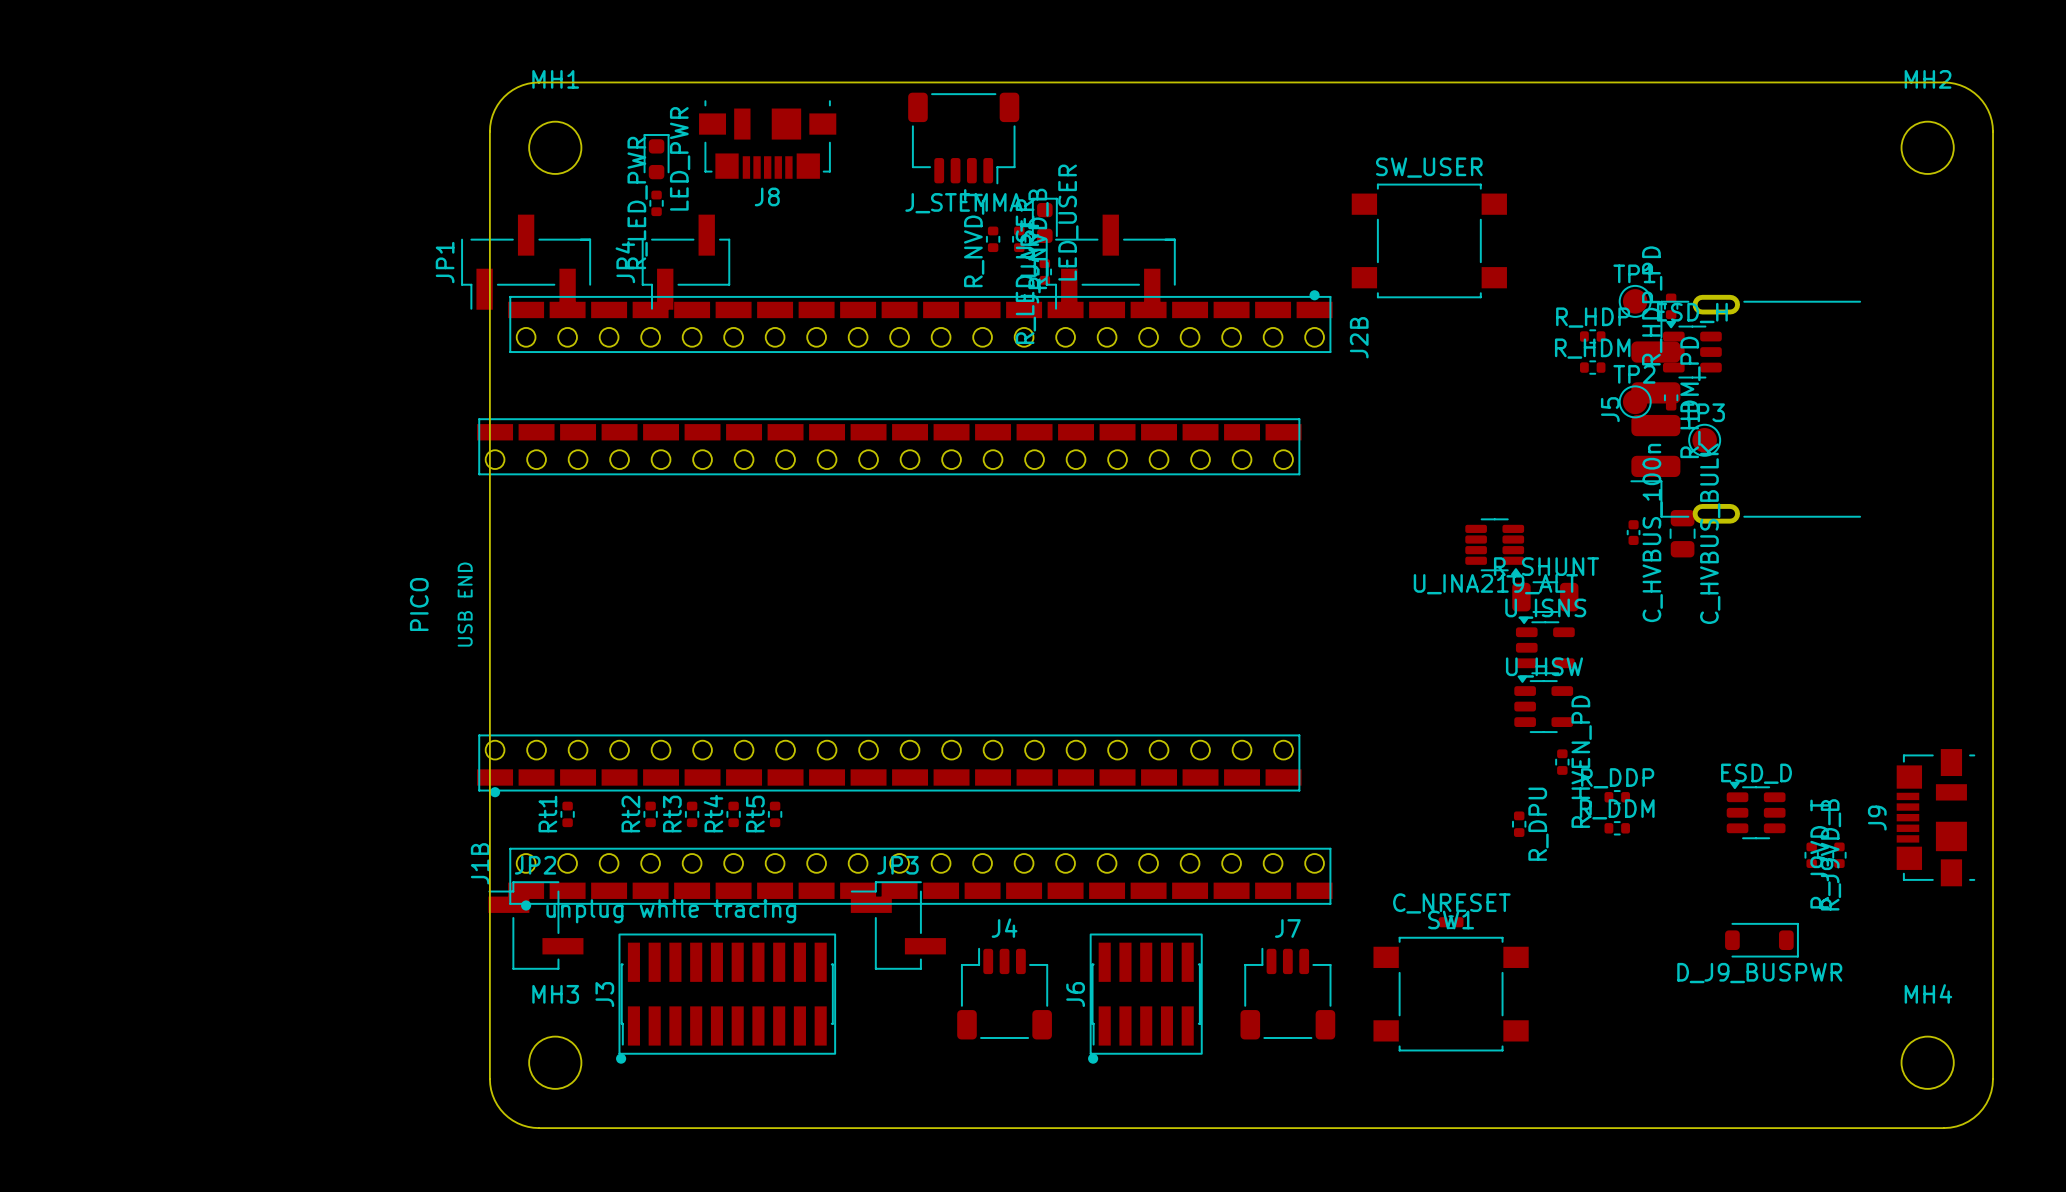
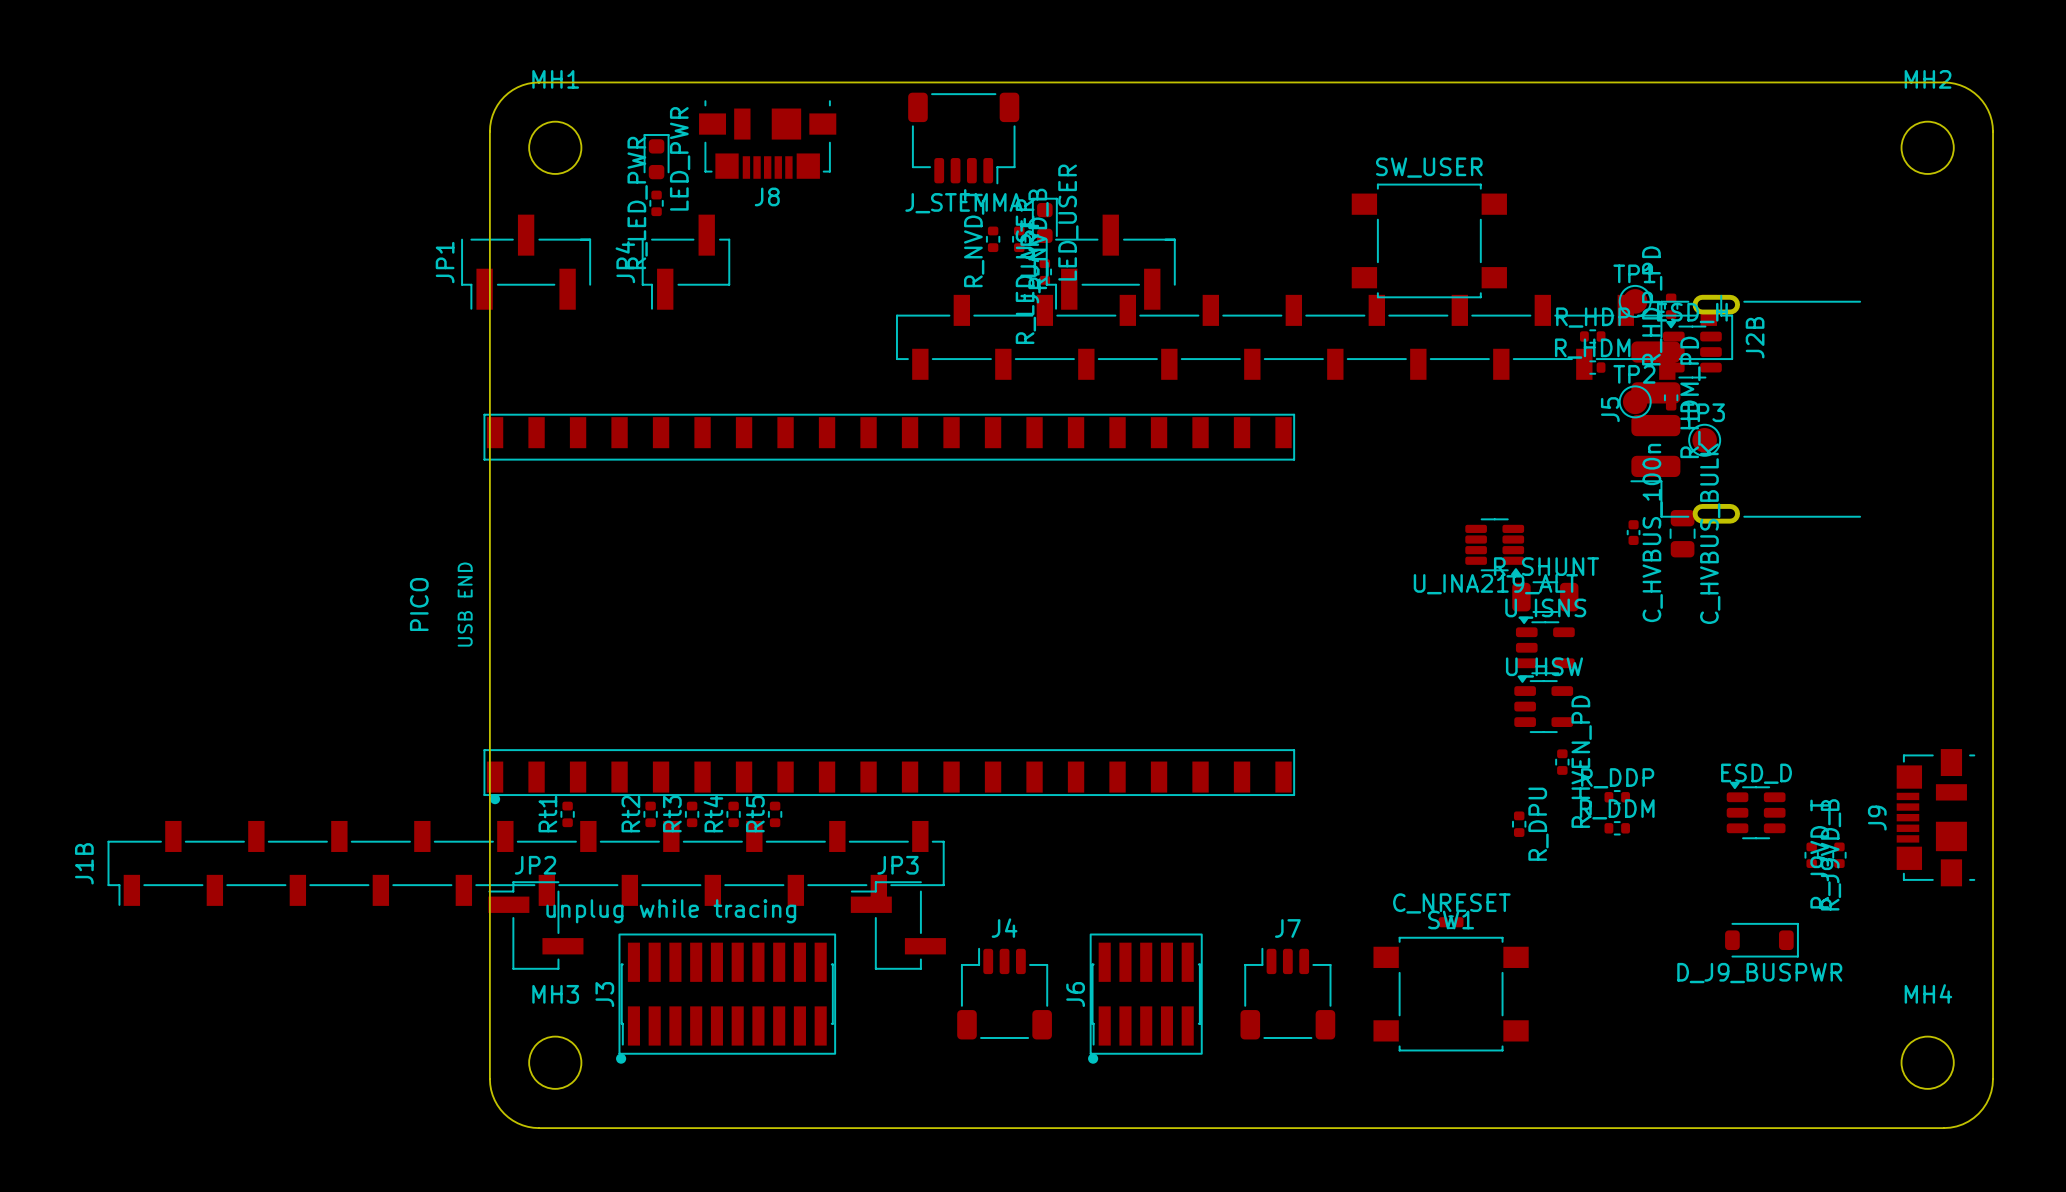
J2B footprint: [508, 290, 1333, 354] -> [896, 294, 1734, 380]
PICO footprint: [477, 418, 1302, 798] -> [483, 413, 1296, 805]
J1B footprint: [508, 847, 1333, 911] -> [107, 820, 945, 906]

